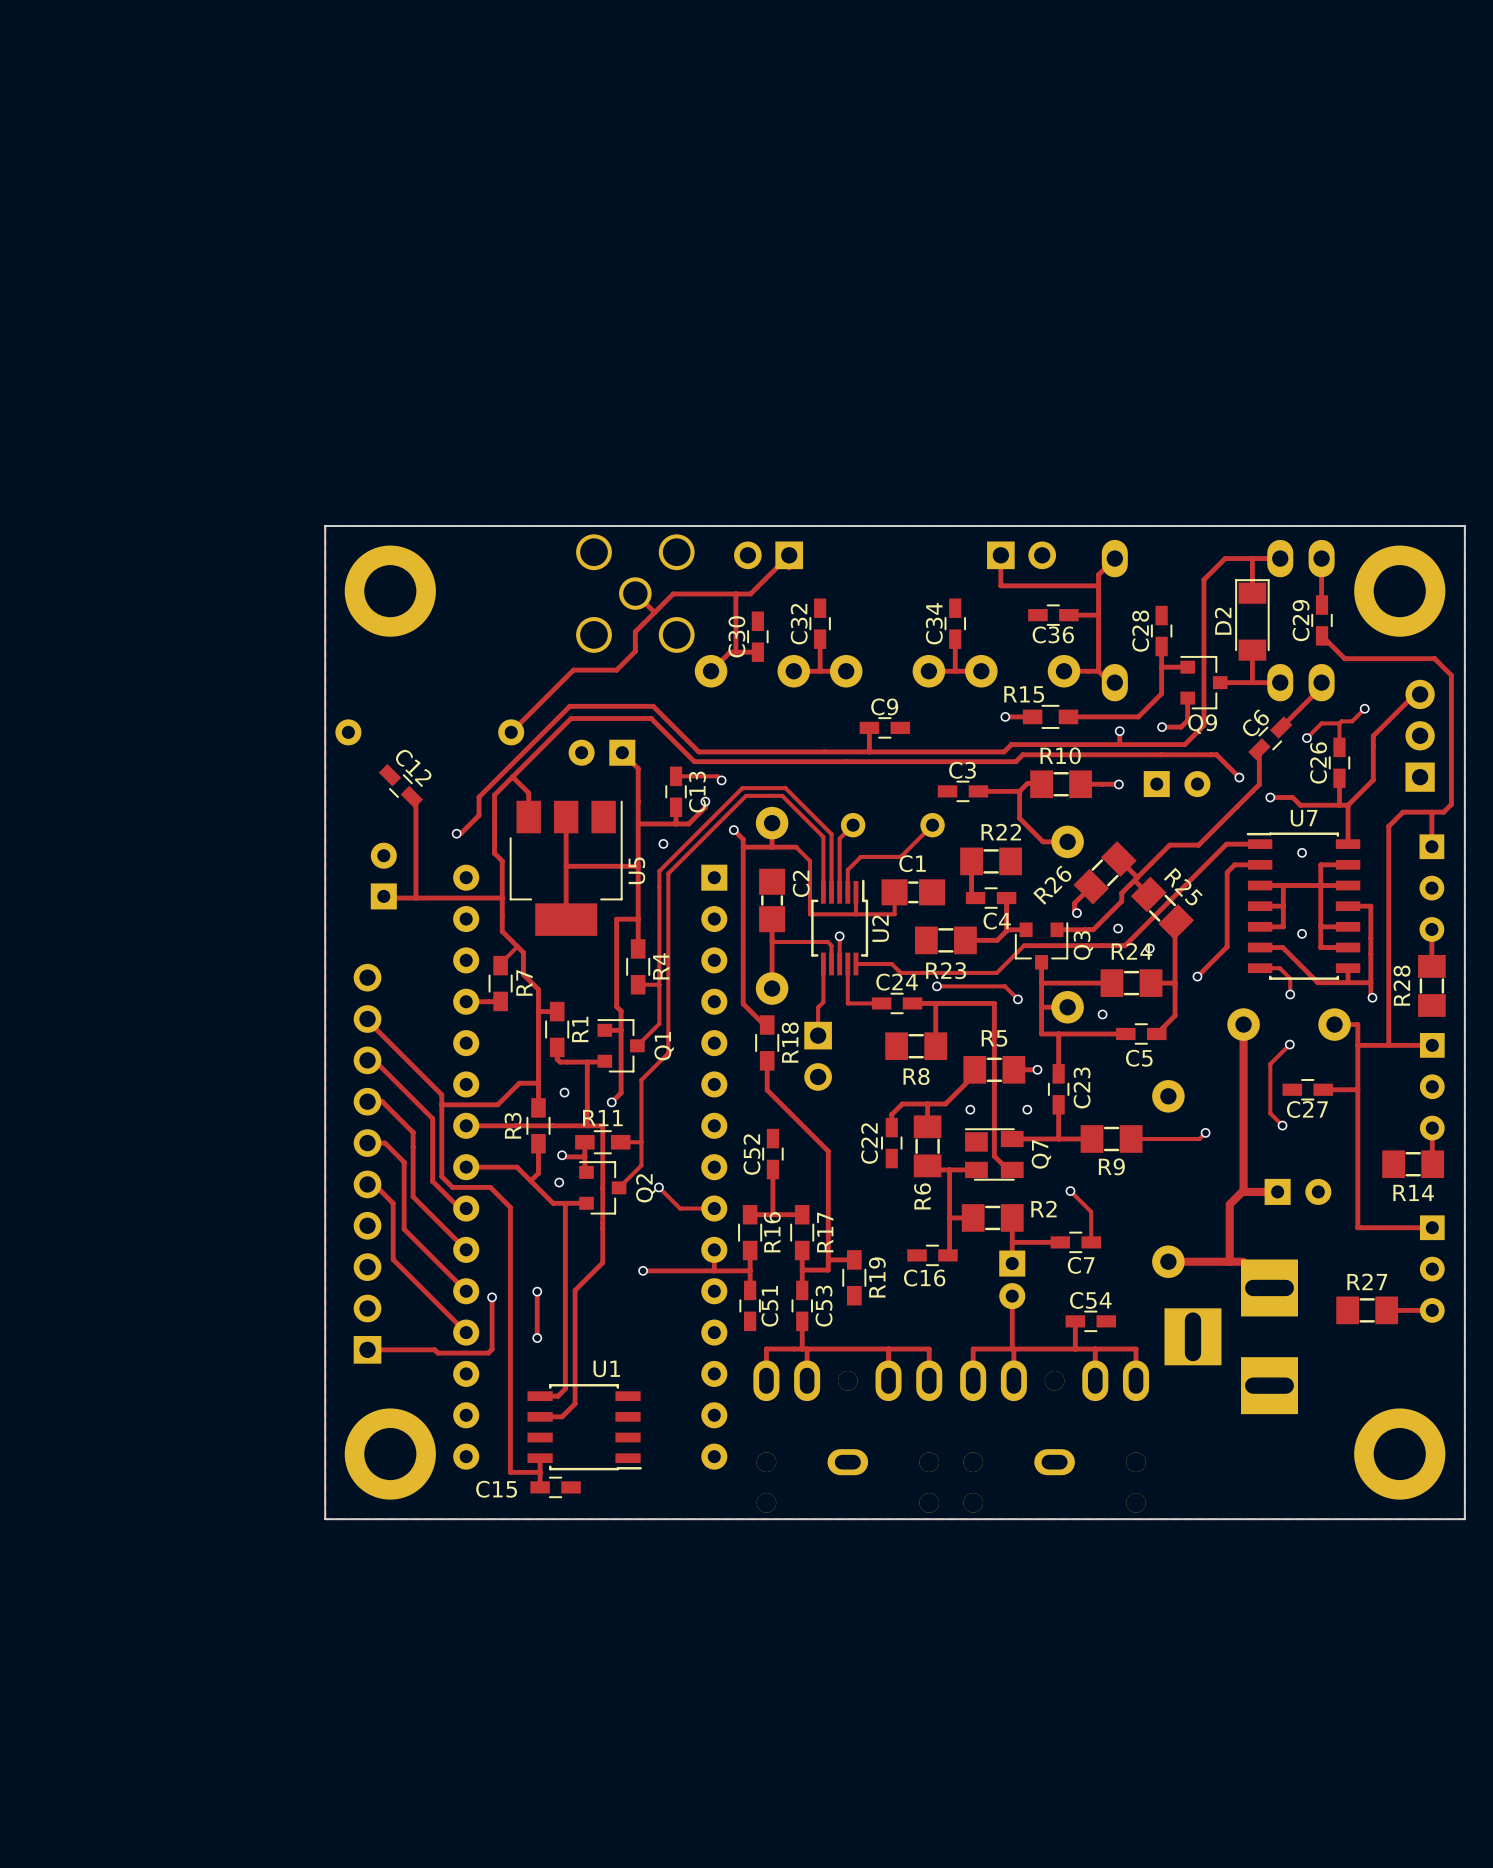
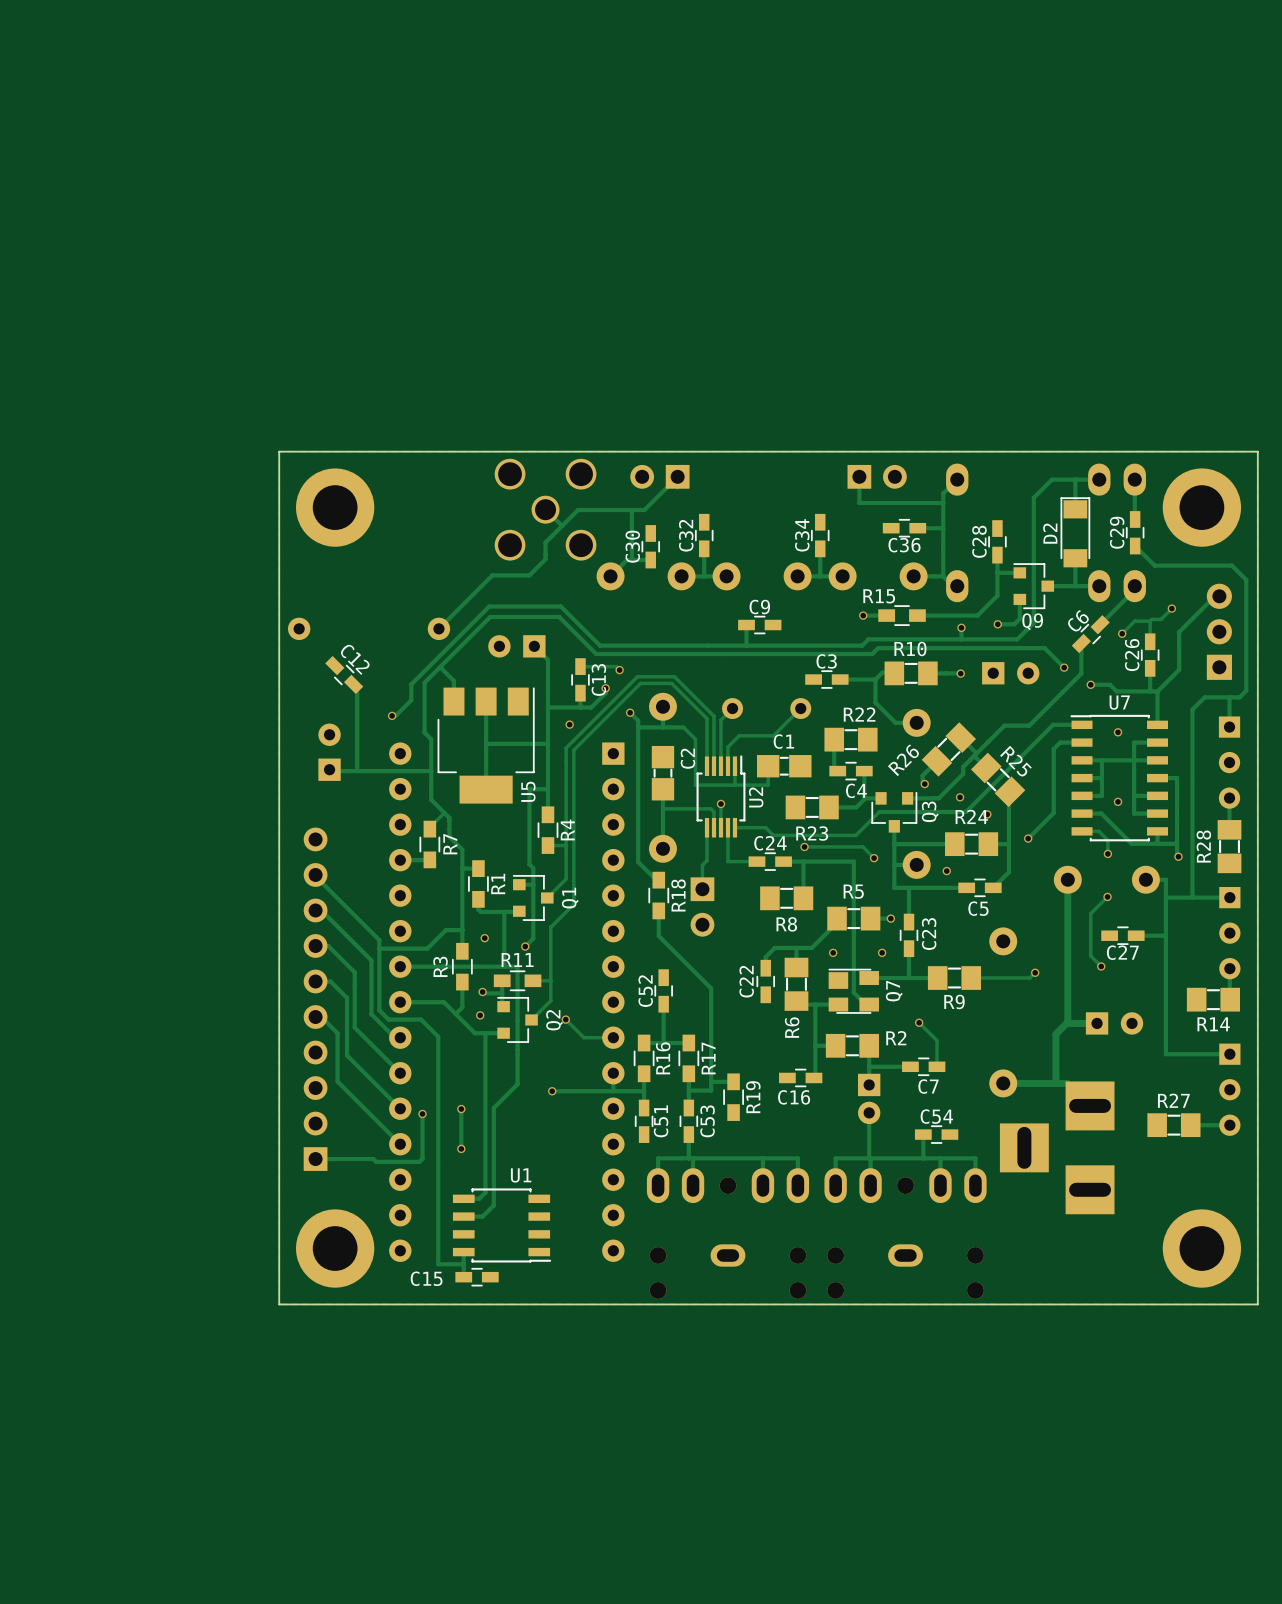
U5 name position: U5 (636, 870) -> U5 (528, 791)

